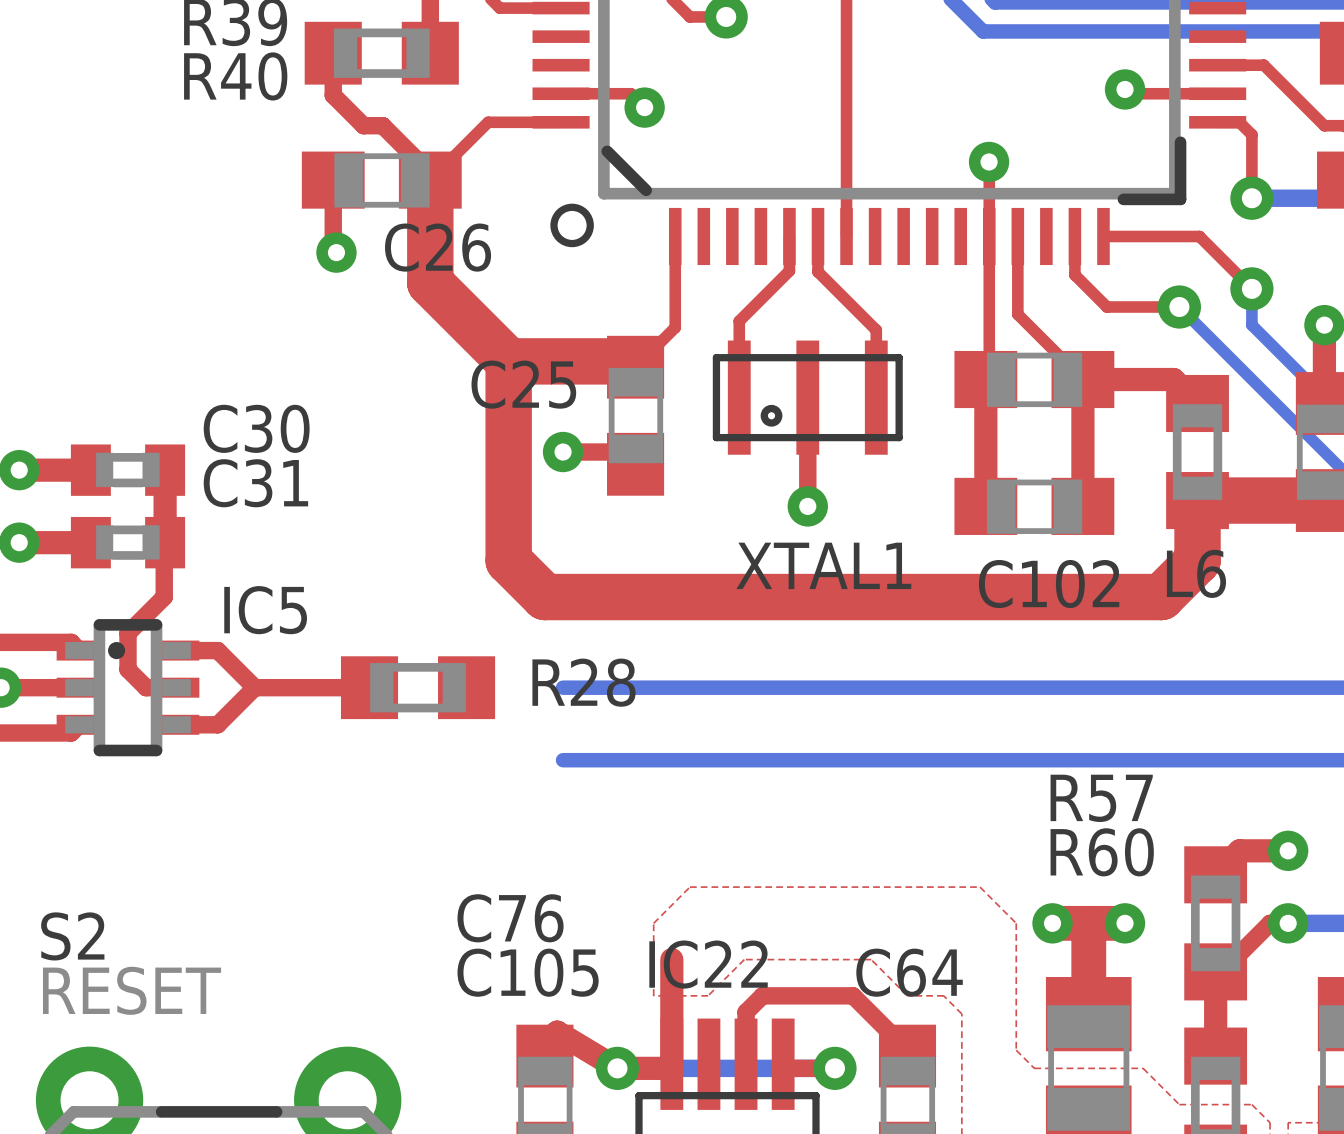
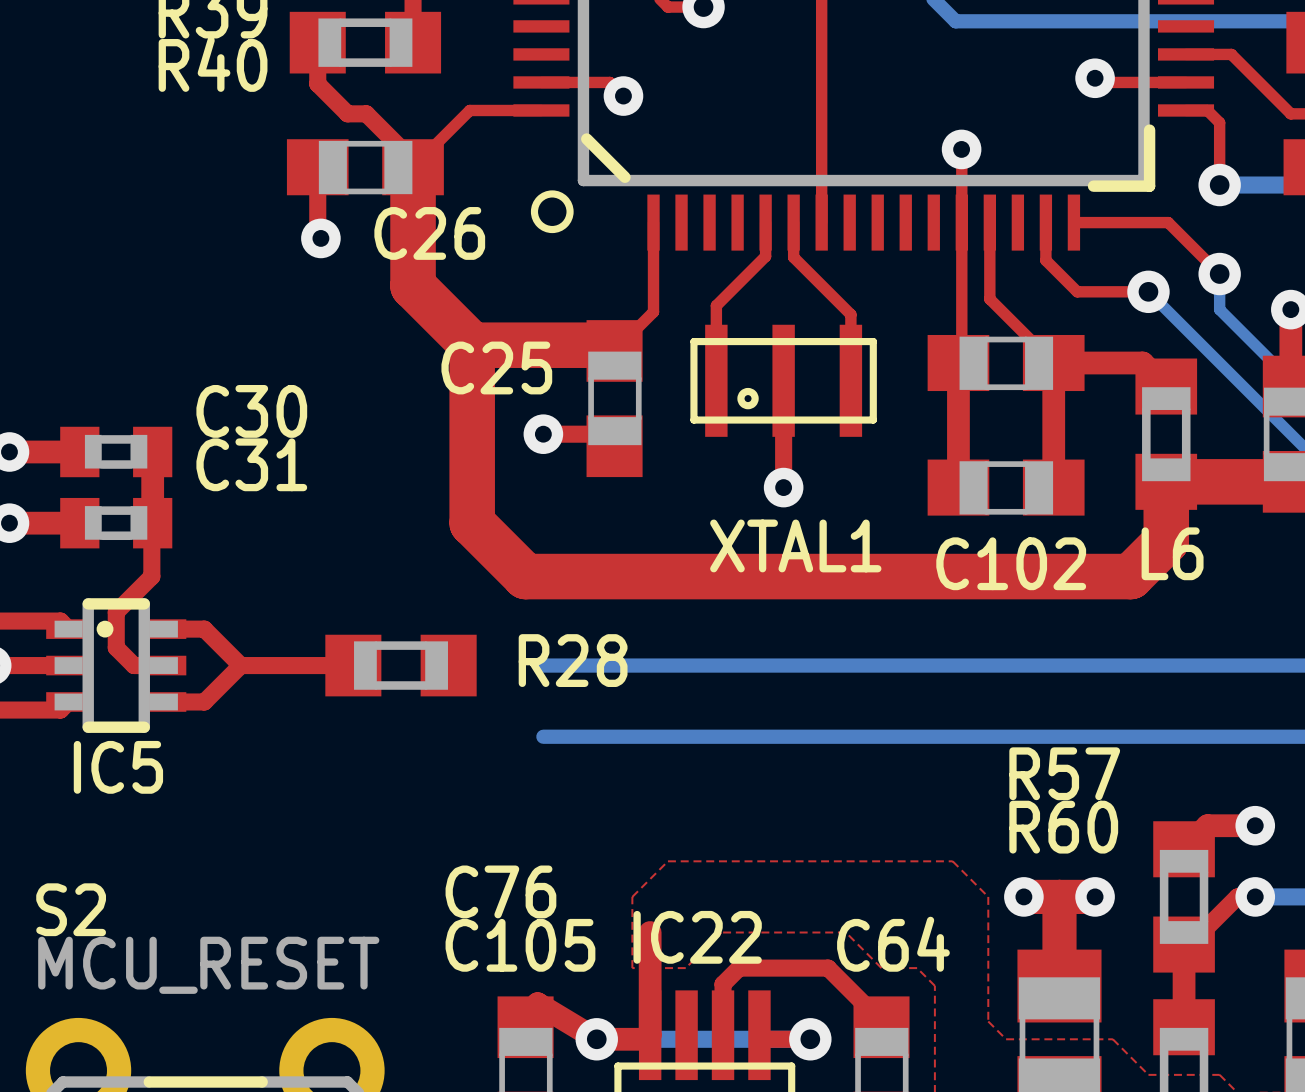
top track: (430, 283) (508, 361) (508, 560) -> (472, 345) (472, 523) (489, 540)
top track: none -> (413, 268) (413, 286) (472, 345)
IC5 name position: IC5 (265, 610) -> IC5 (118, 767)
S2 value: RESET (132, 990) -> MCU_RESET (208, 965)

